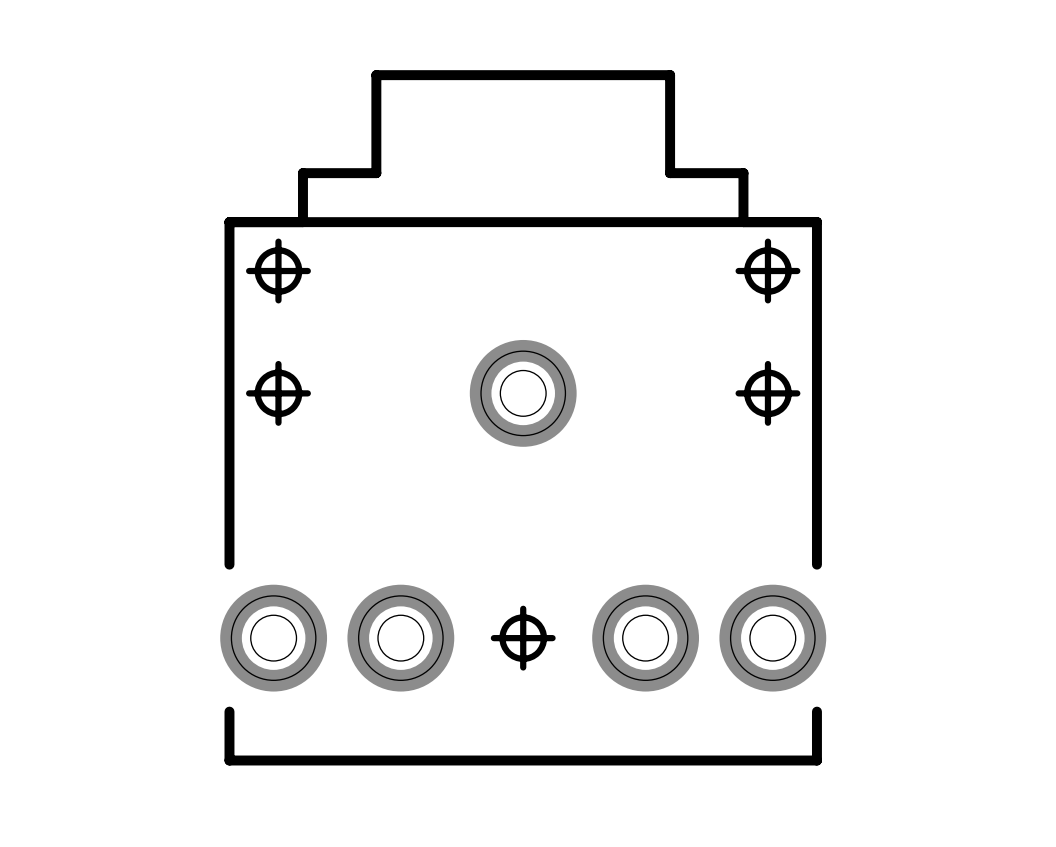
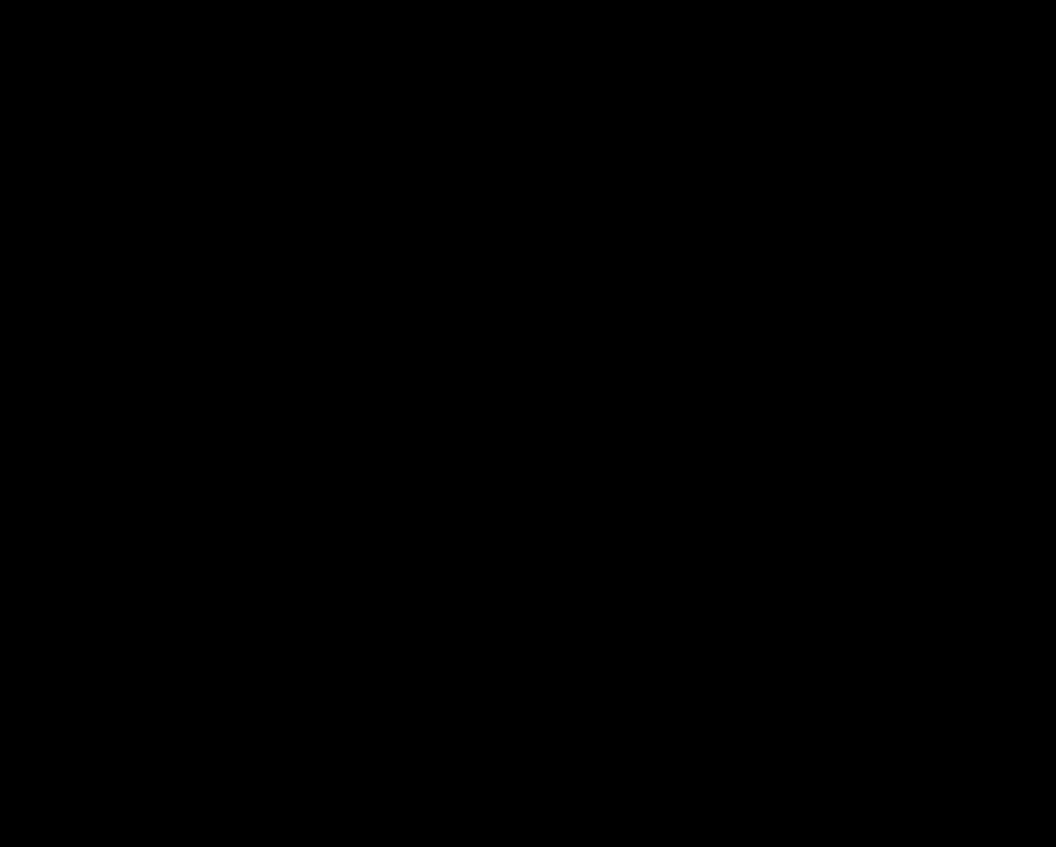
part: (523, 417) -> none

